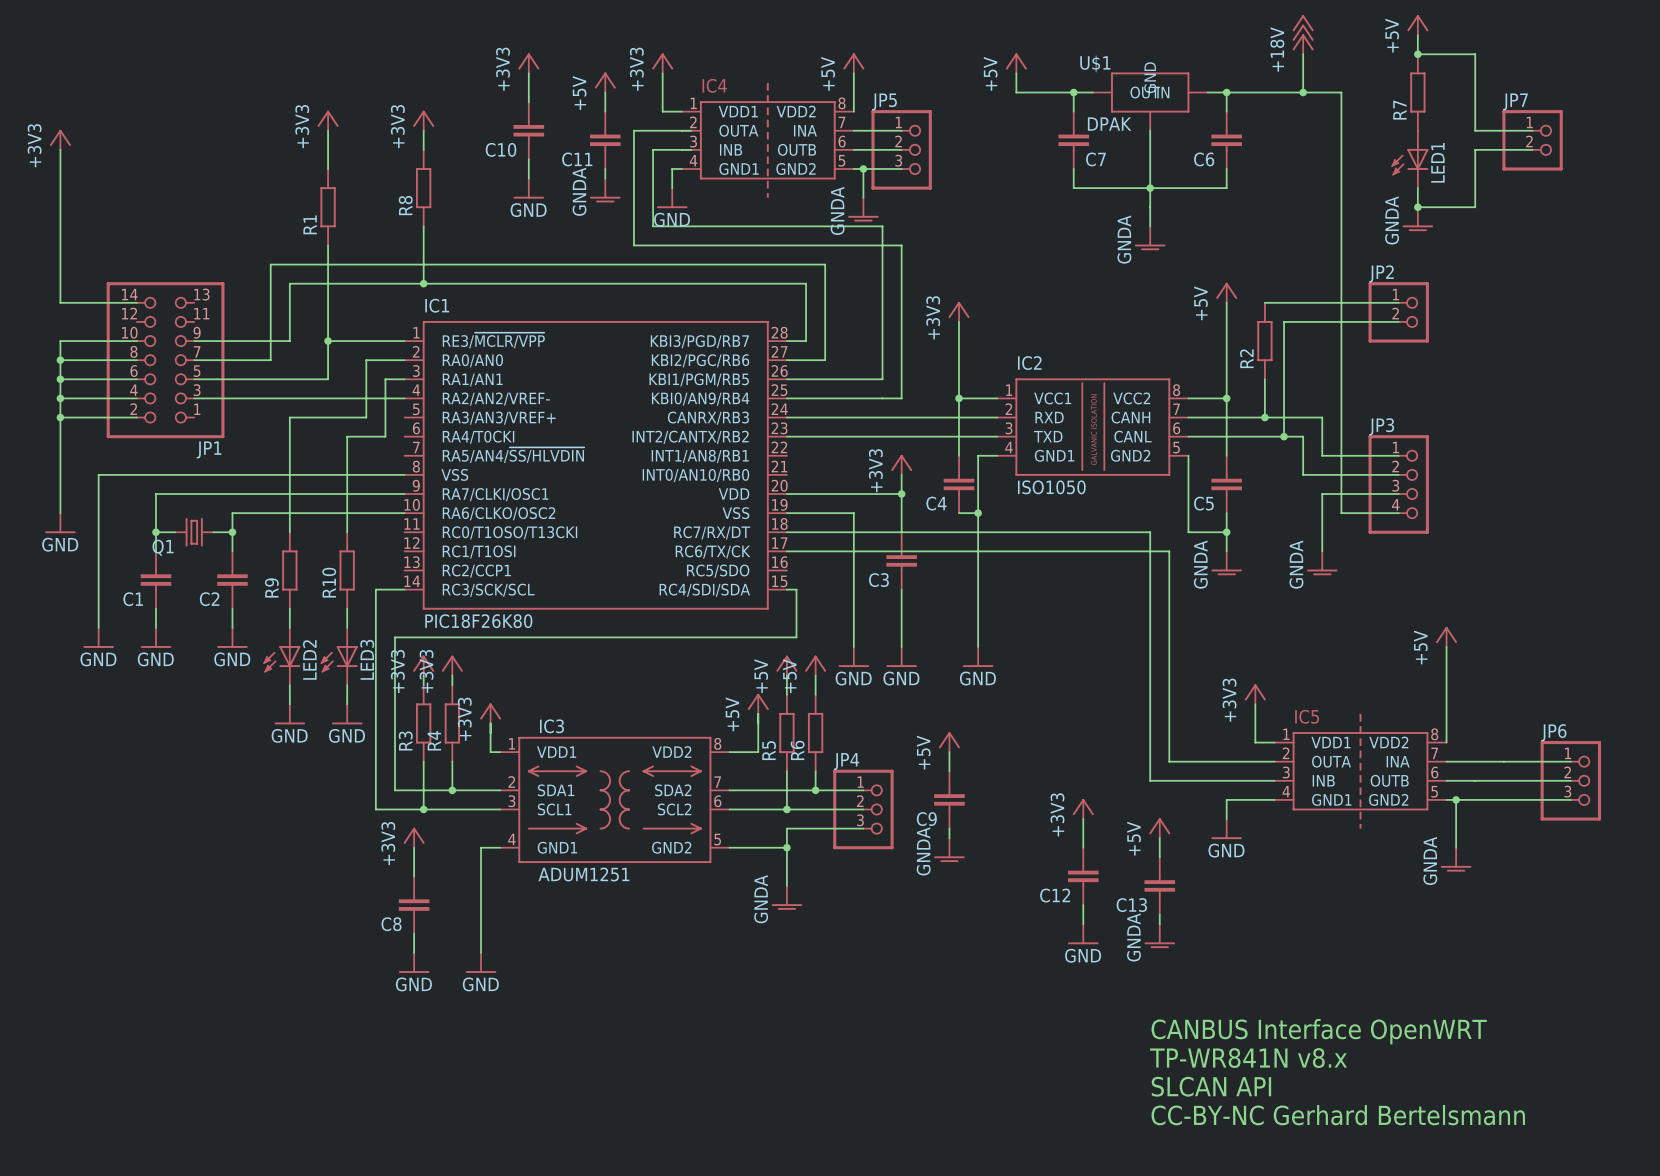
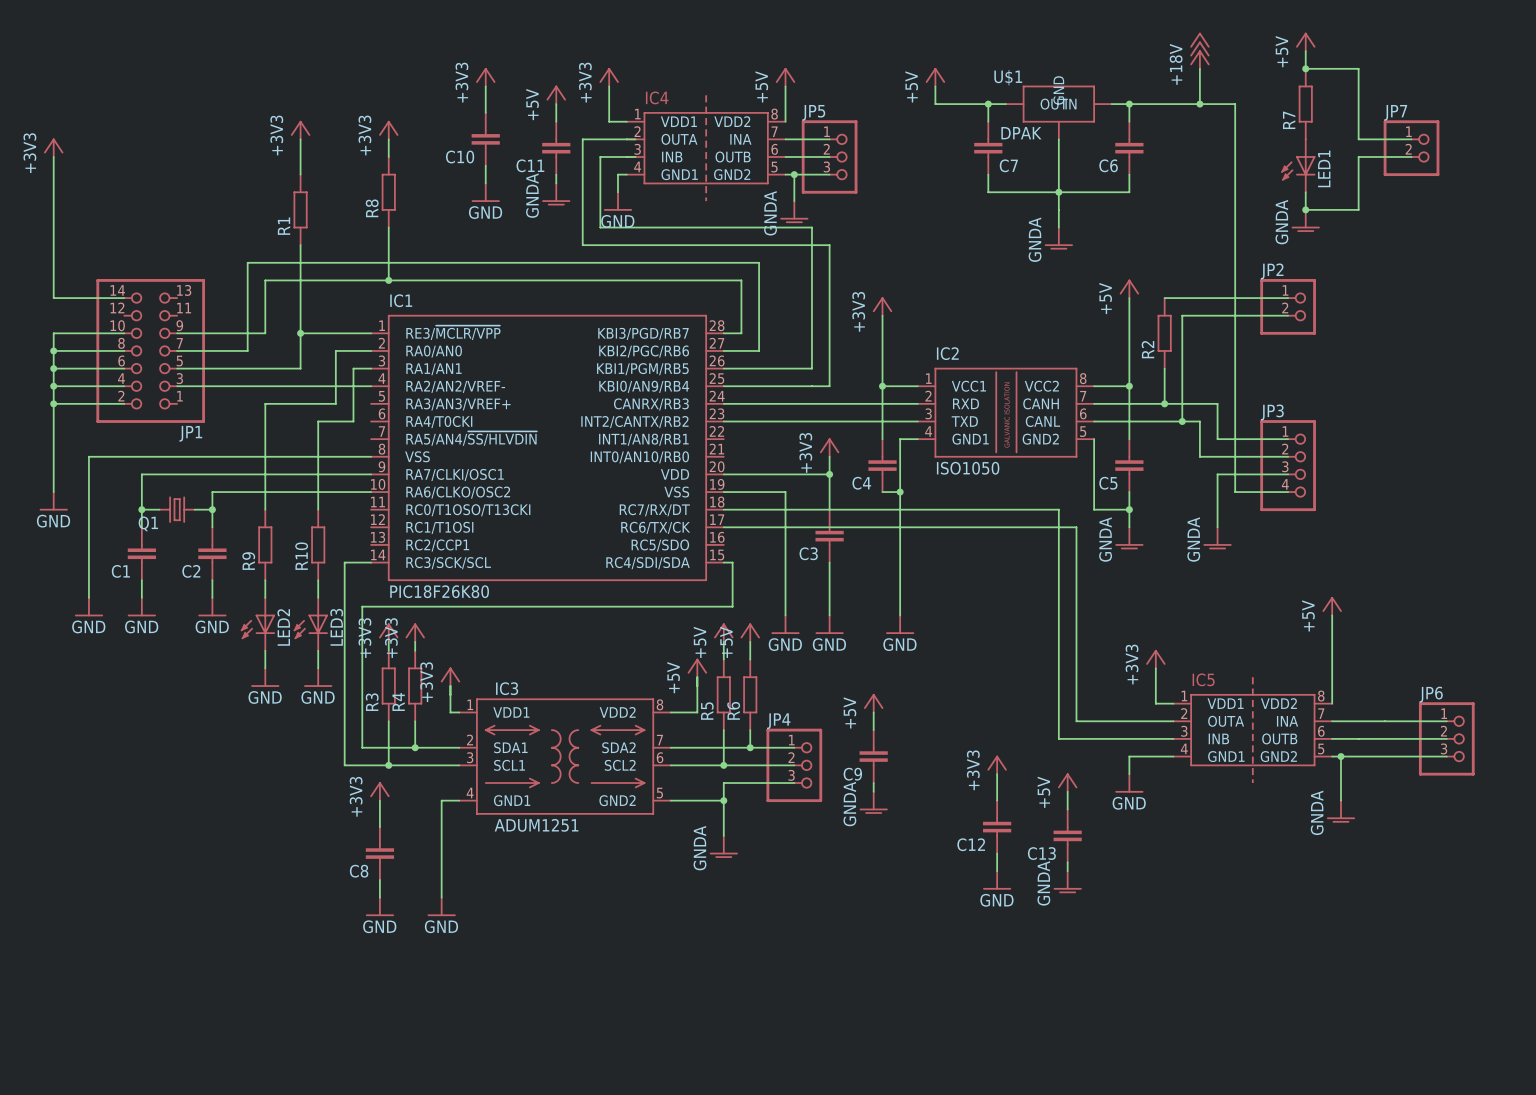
text: CANBUS Interface OpenWRT (1319, 1031) -> none
text: TP-WR841N v8.x (1248, 1058) -> none
text: SLCAN API (1211, 1086) -> none
text: CC-BY-NC Gerhard Bertelsmann (1338, 1115) -> none

